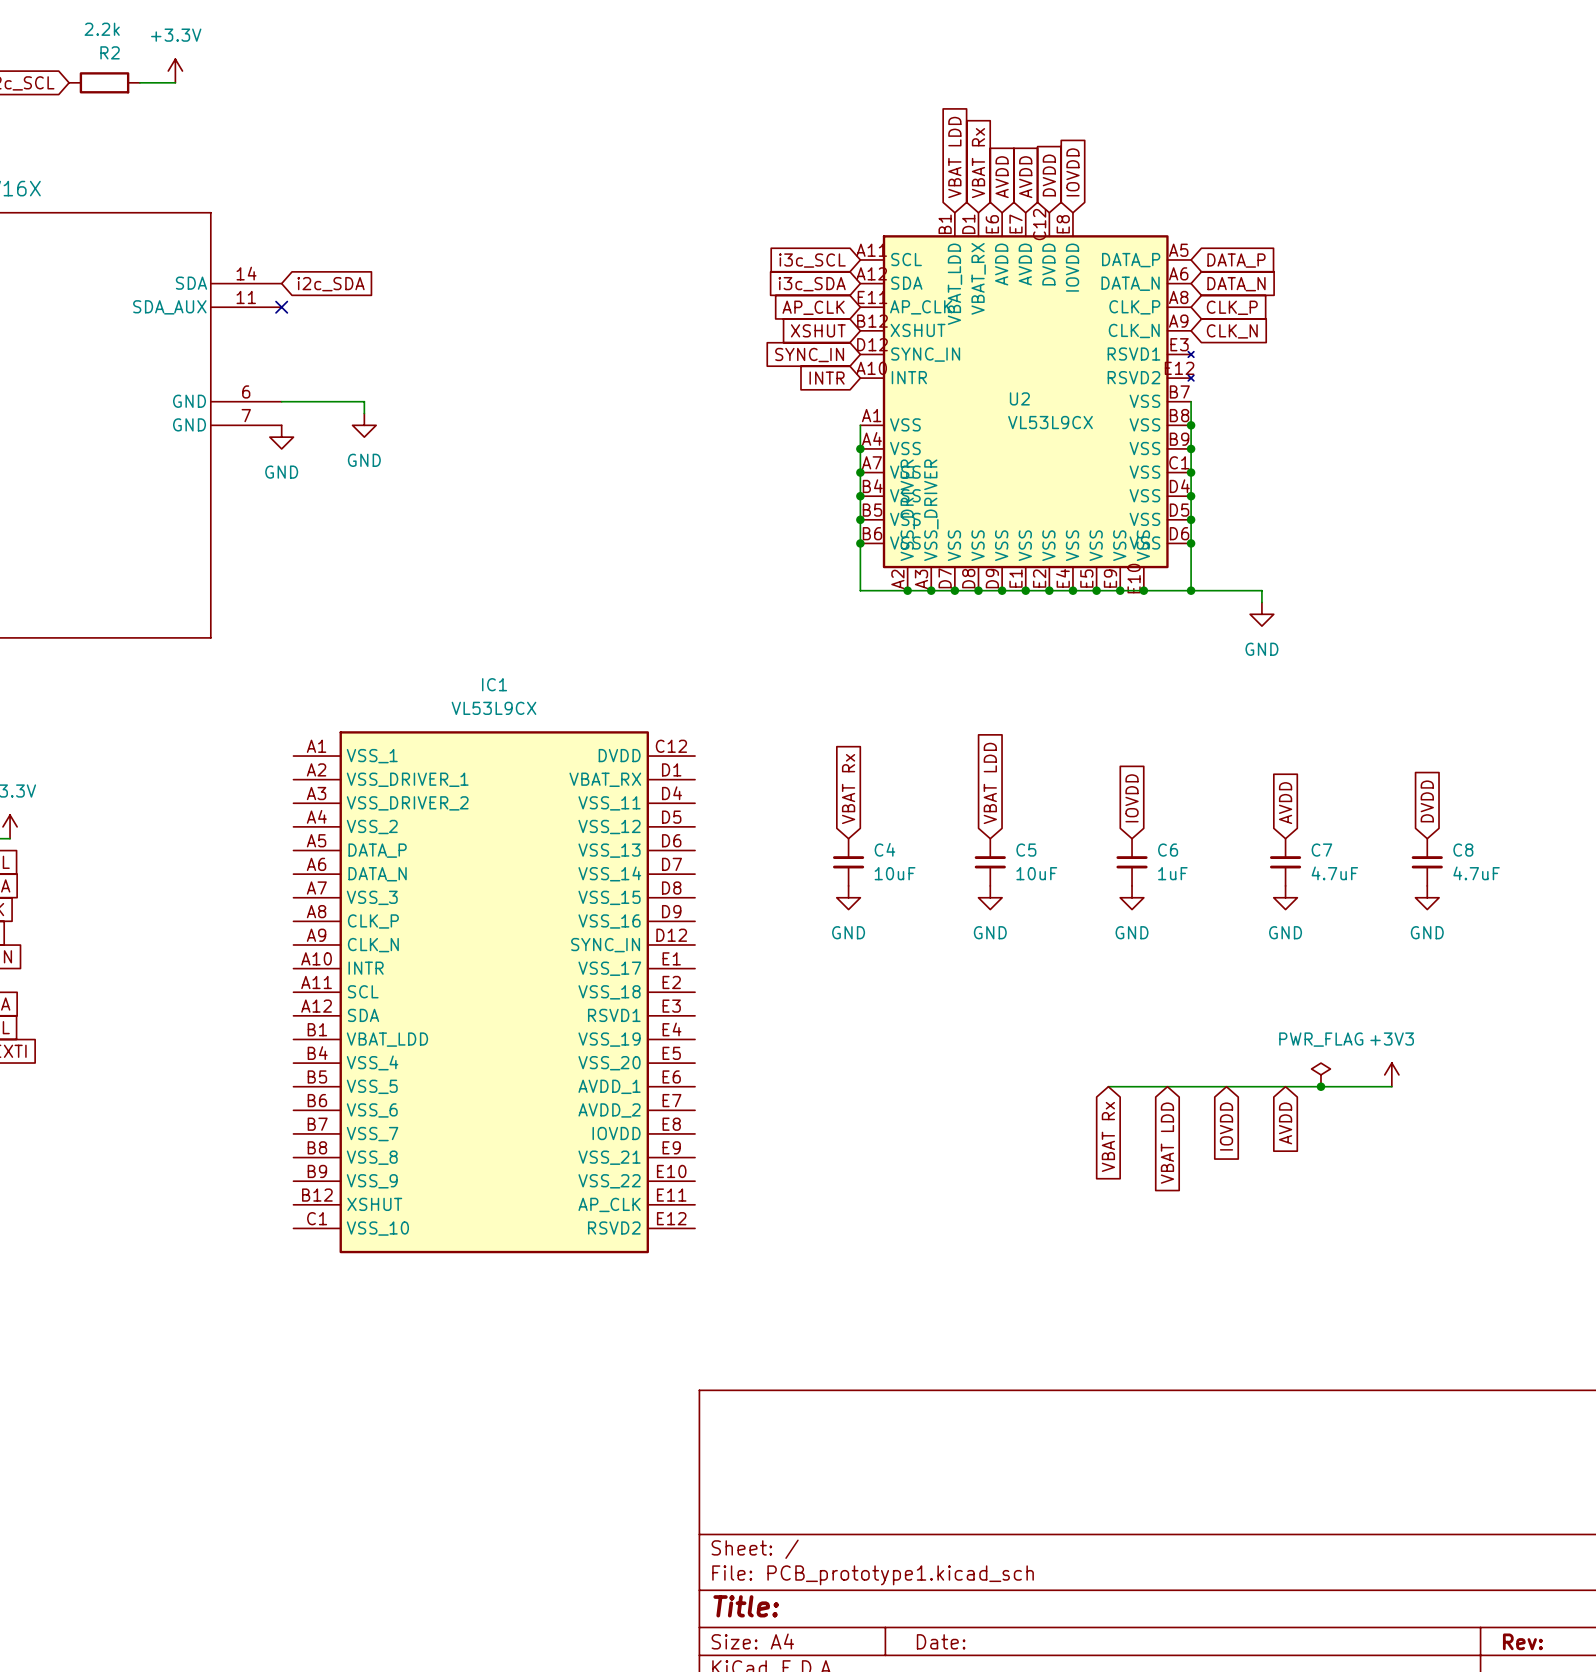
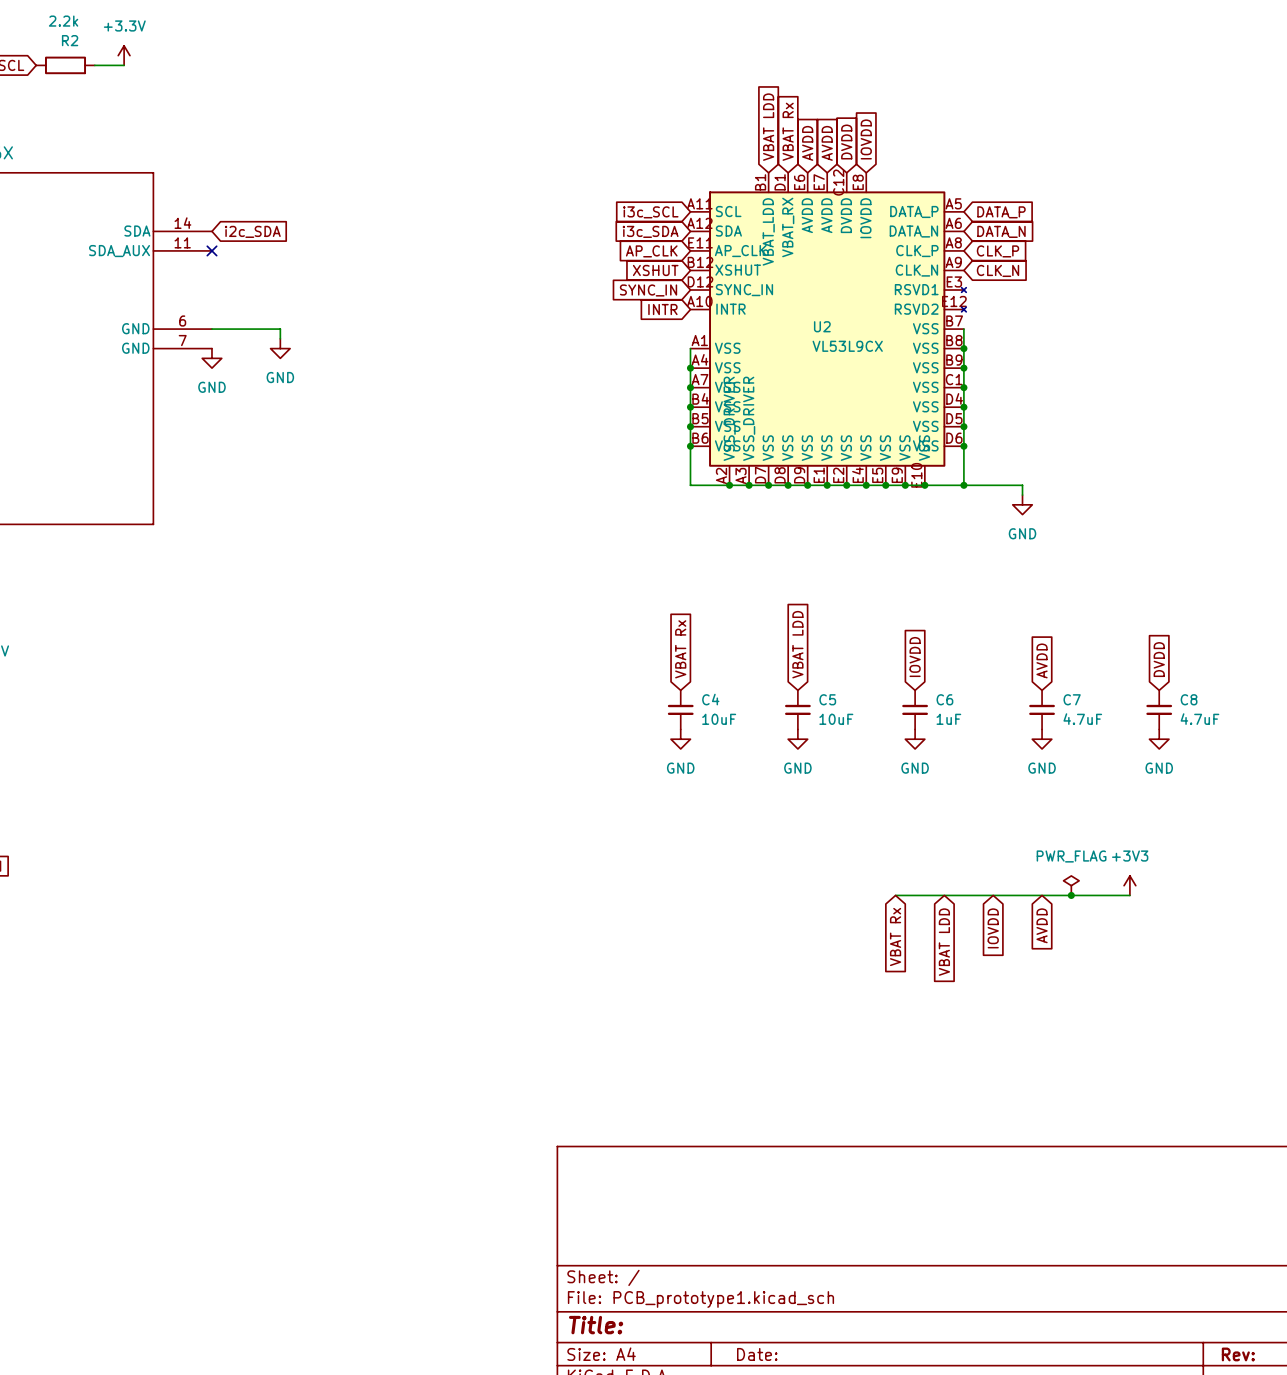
IC1: VL53L9CX (494, 992) -> none

